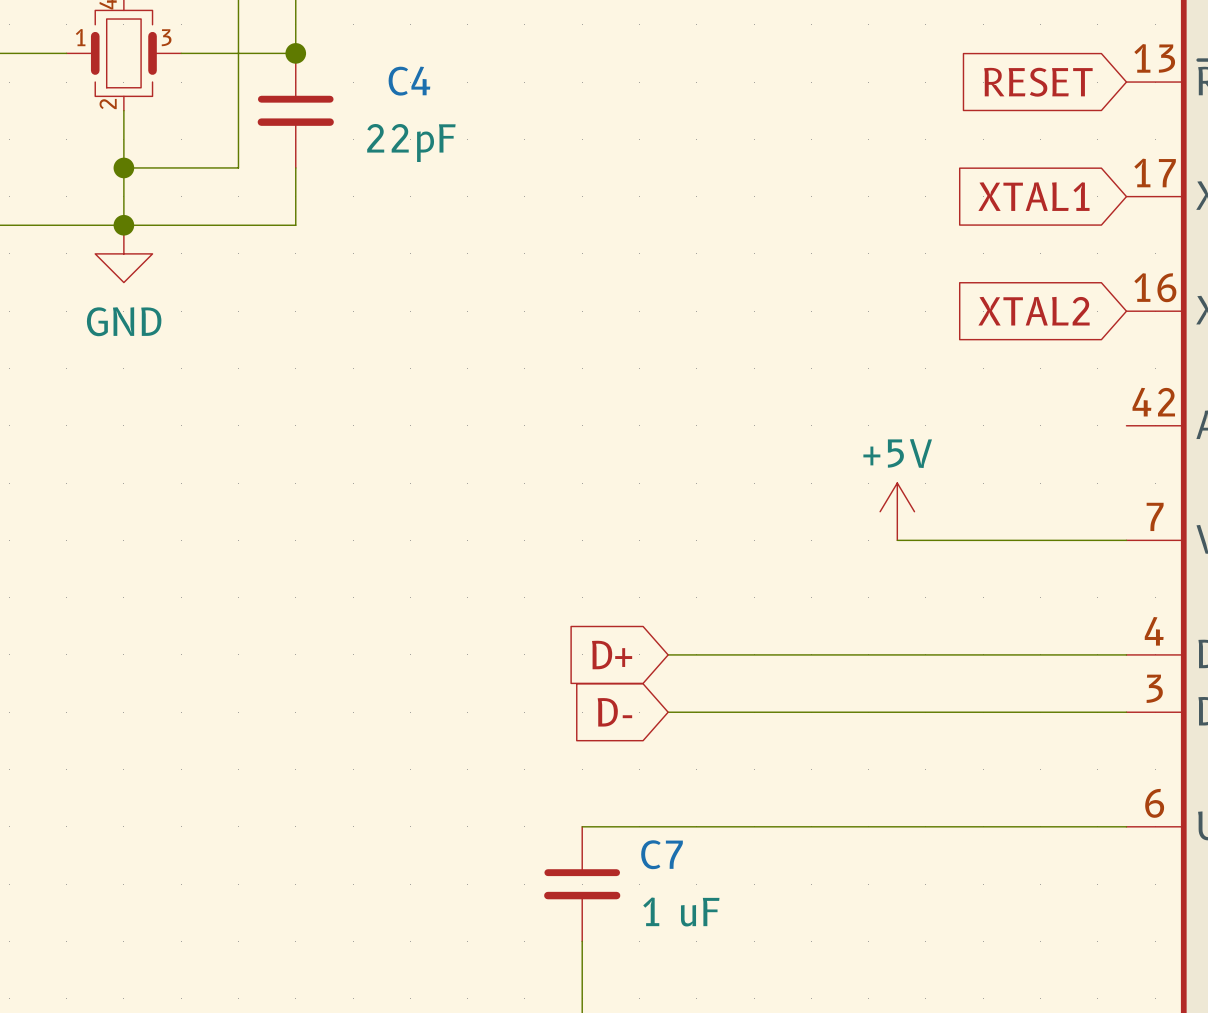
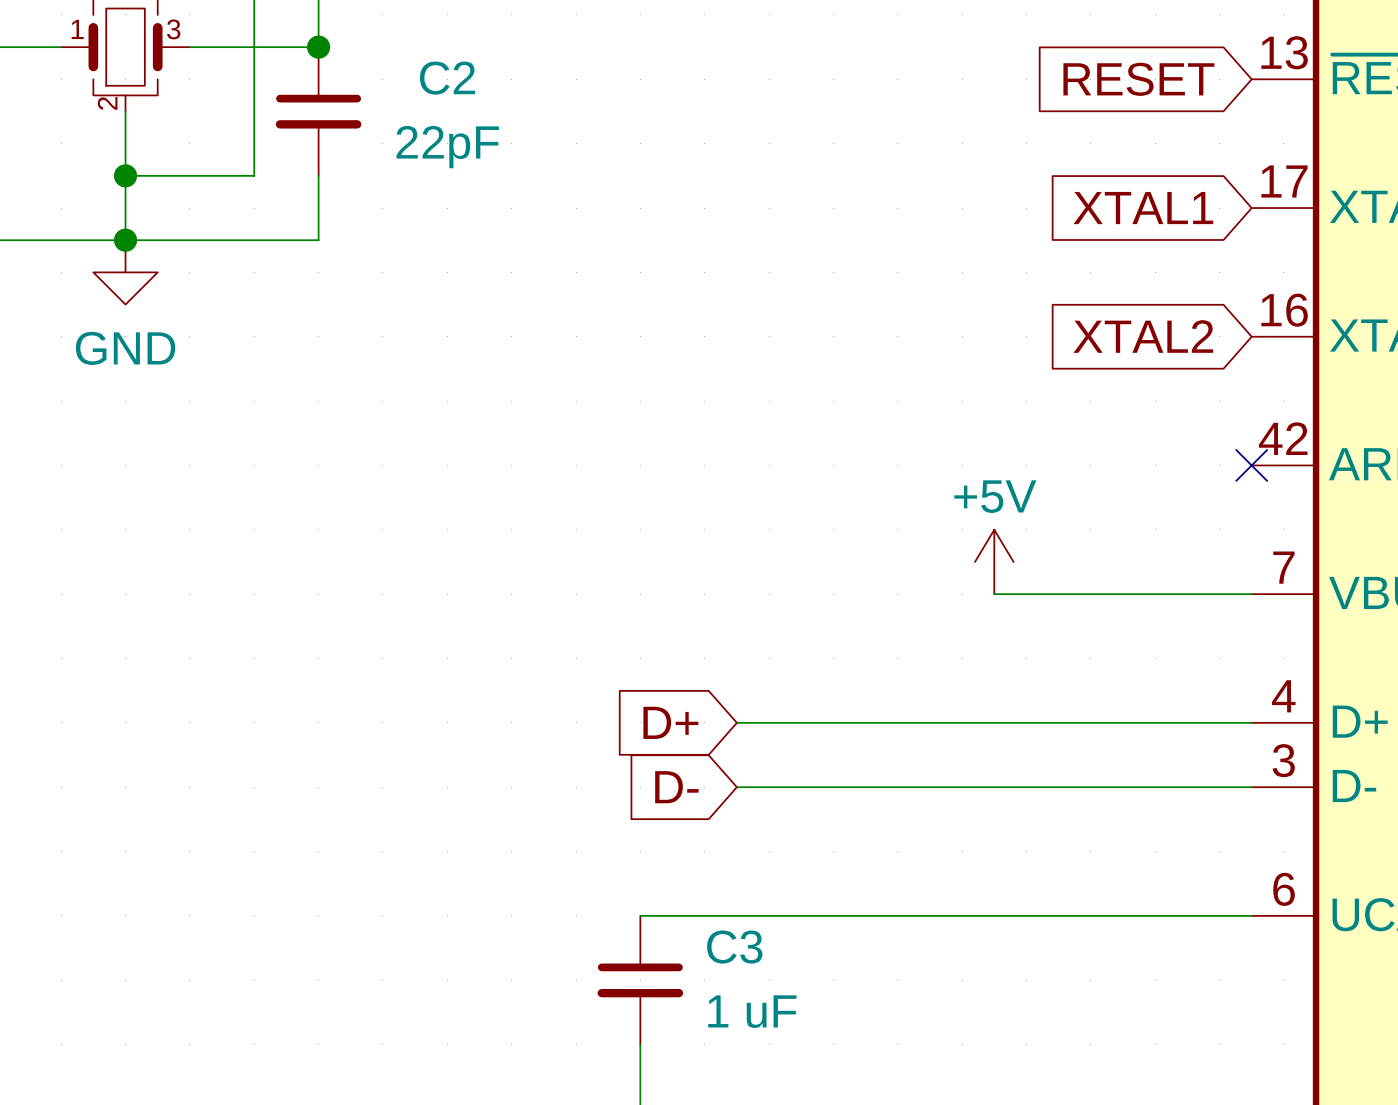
C4 name: C4 (409, 81) -> C2 (447, 78)
no-connect mark: none -> (1251, 465)
C7 name: C7 (662, 854) -> C3 (734, 947)

